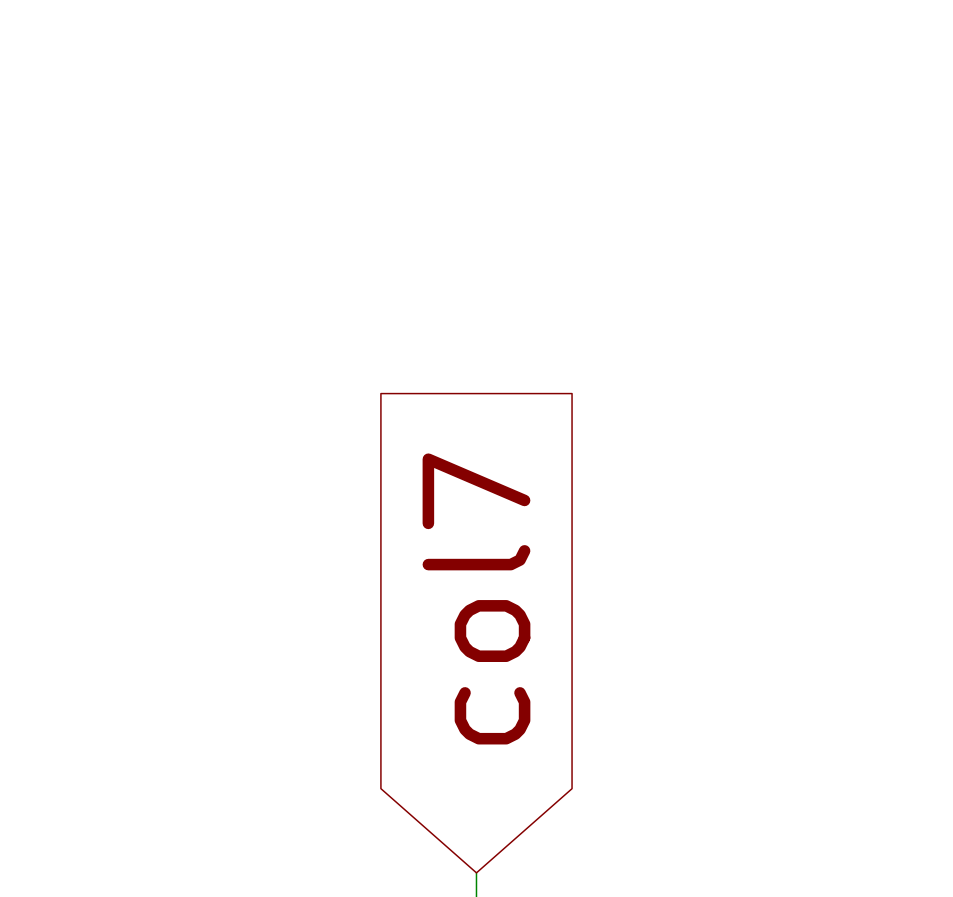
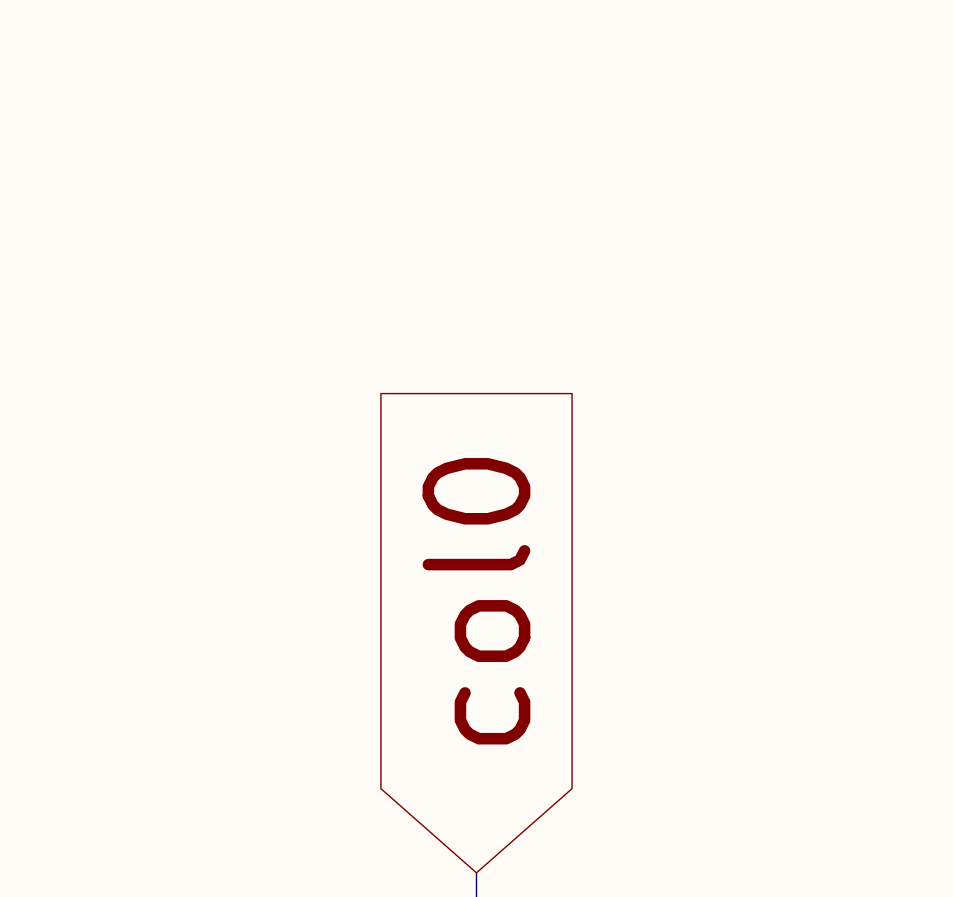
global label: col7 (476, 598) -> col0 (476, 601)

